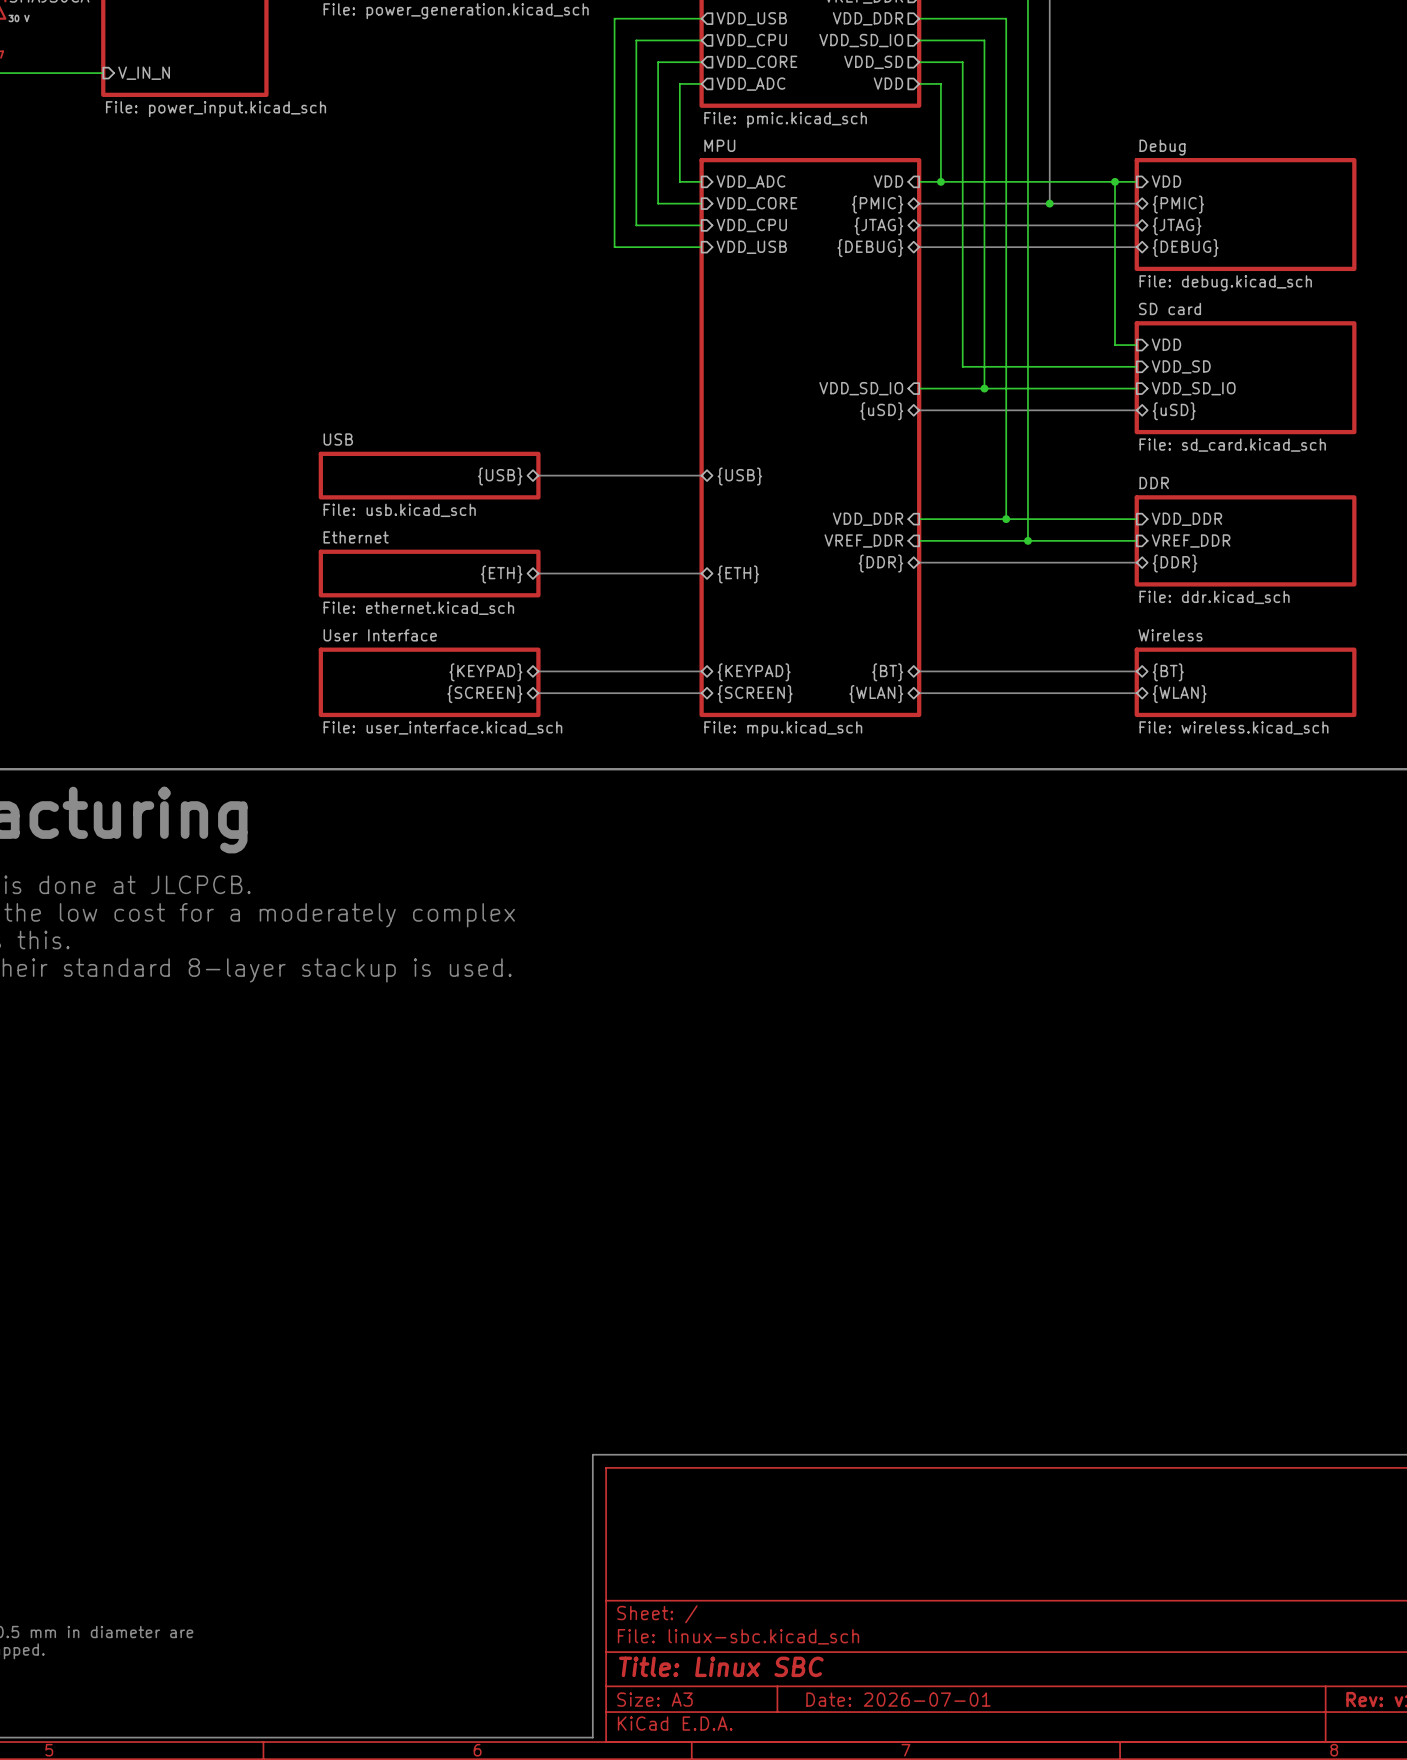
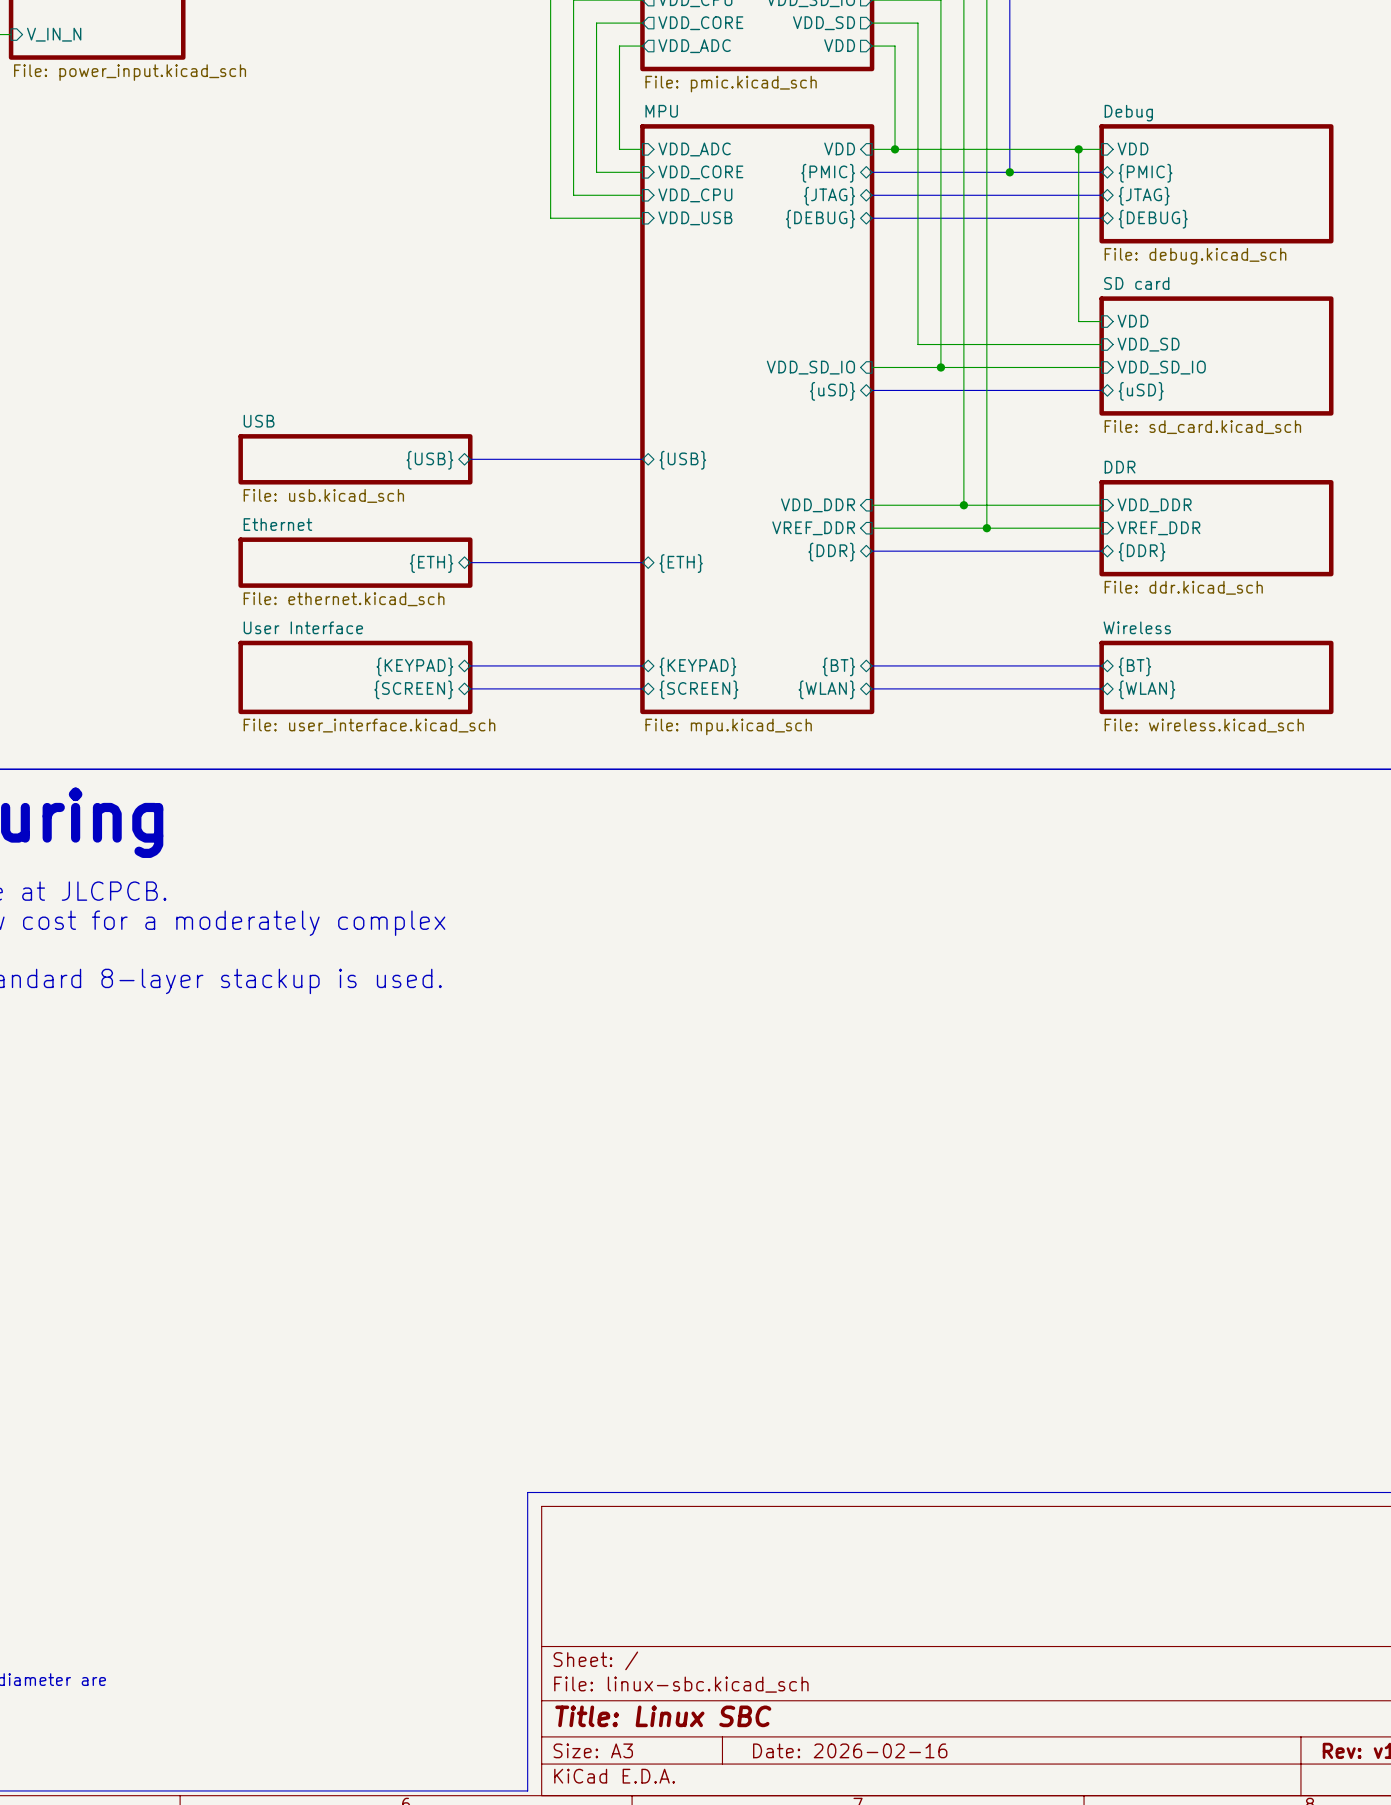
title block: Date: 2026-07-01 (898, 1699) -> Date: 2026-02-16 (850, 1750)

